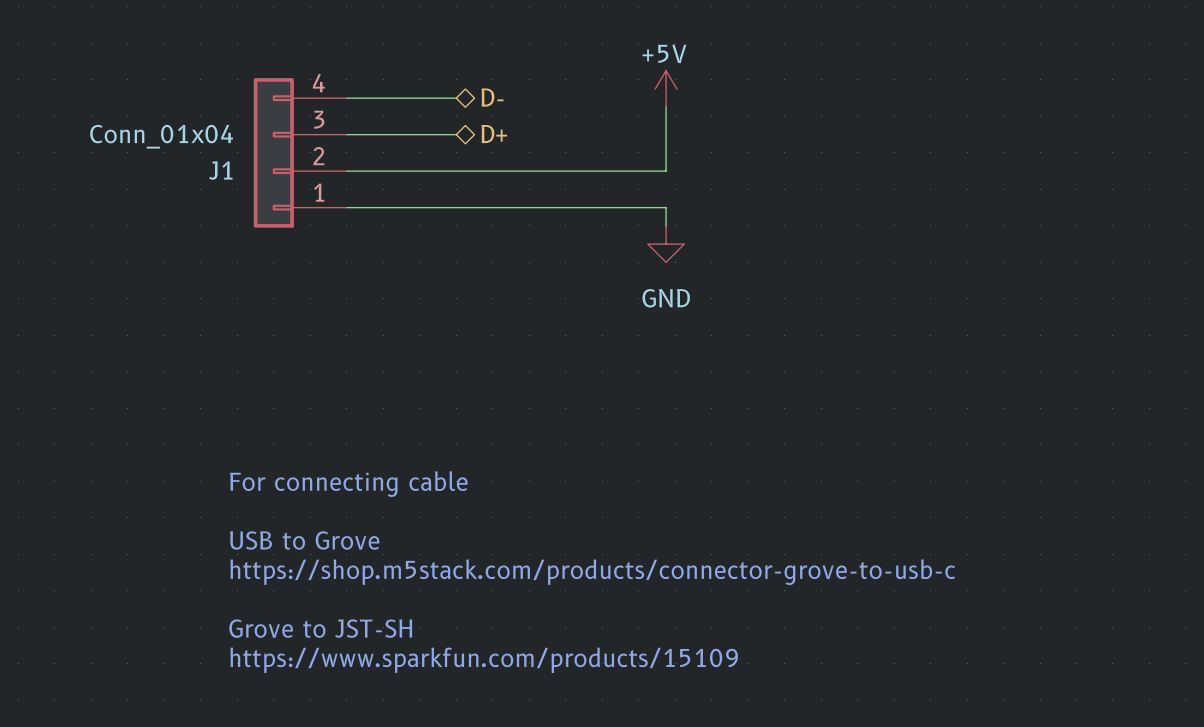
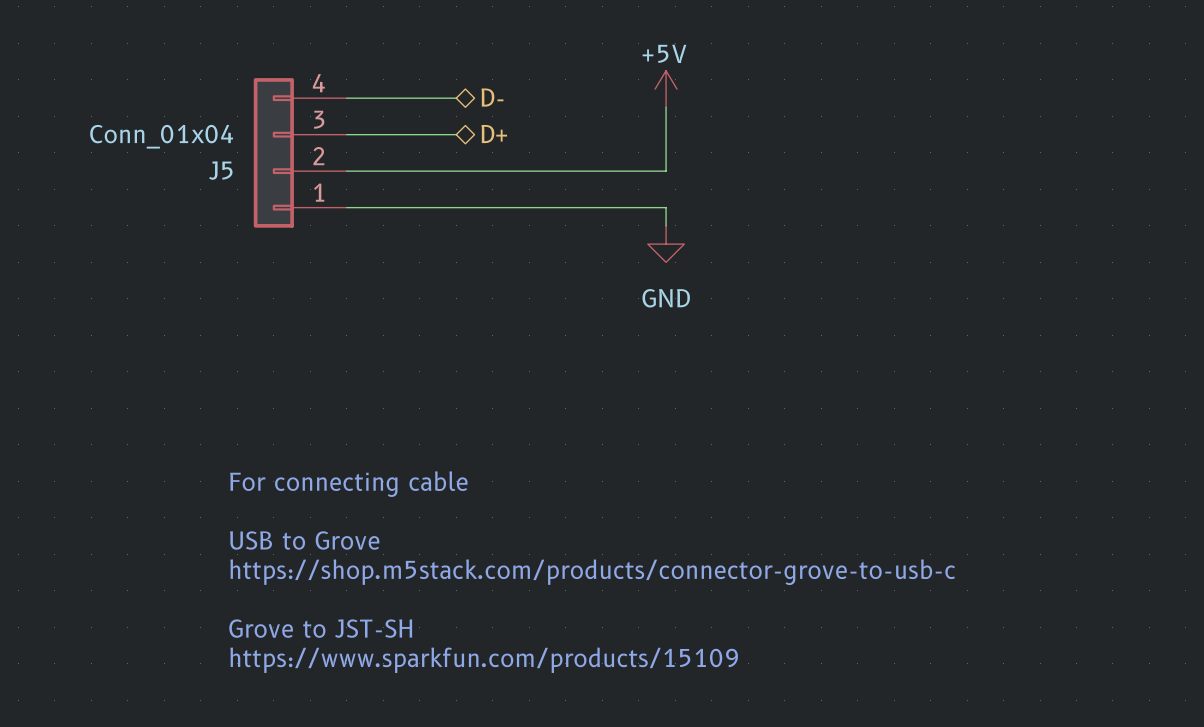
J1 name: J1 (220, 170) -> J5 (220, 170)

